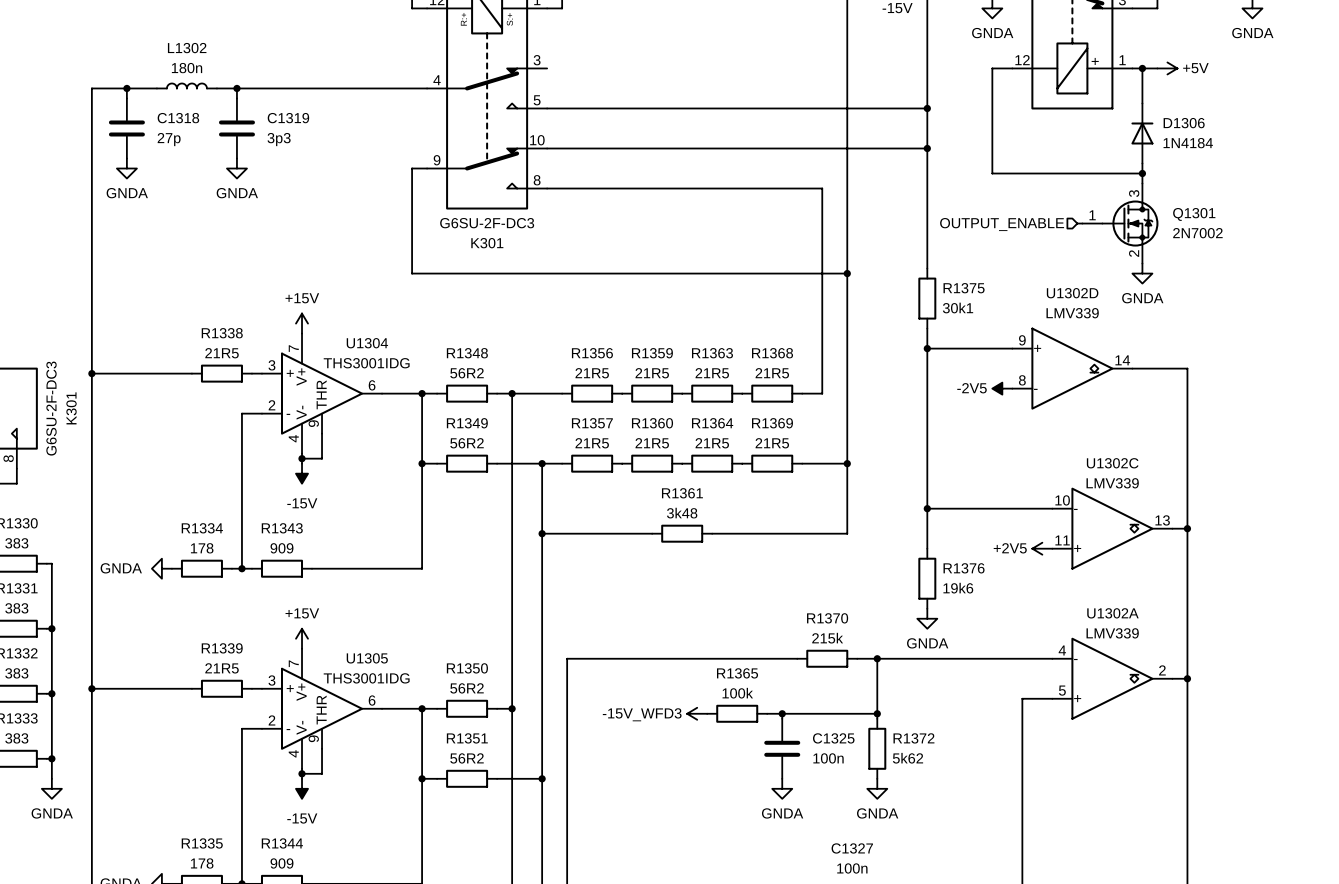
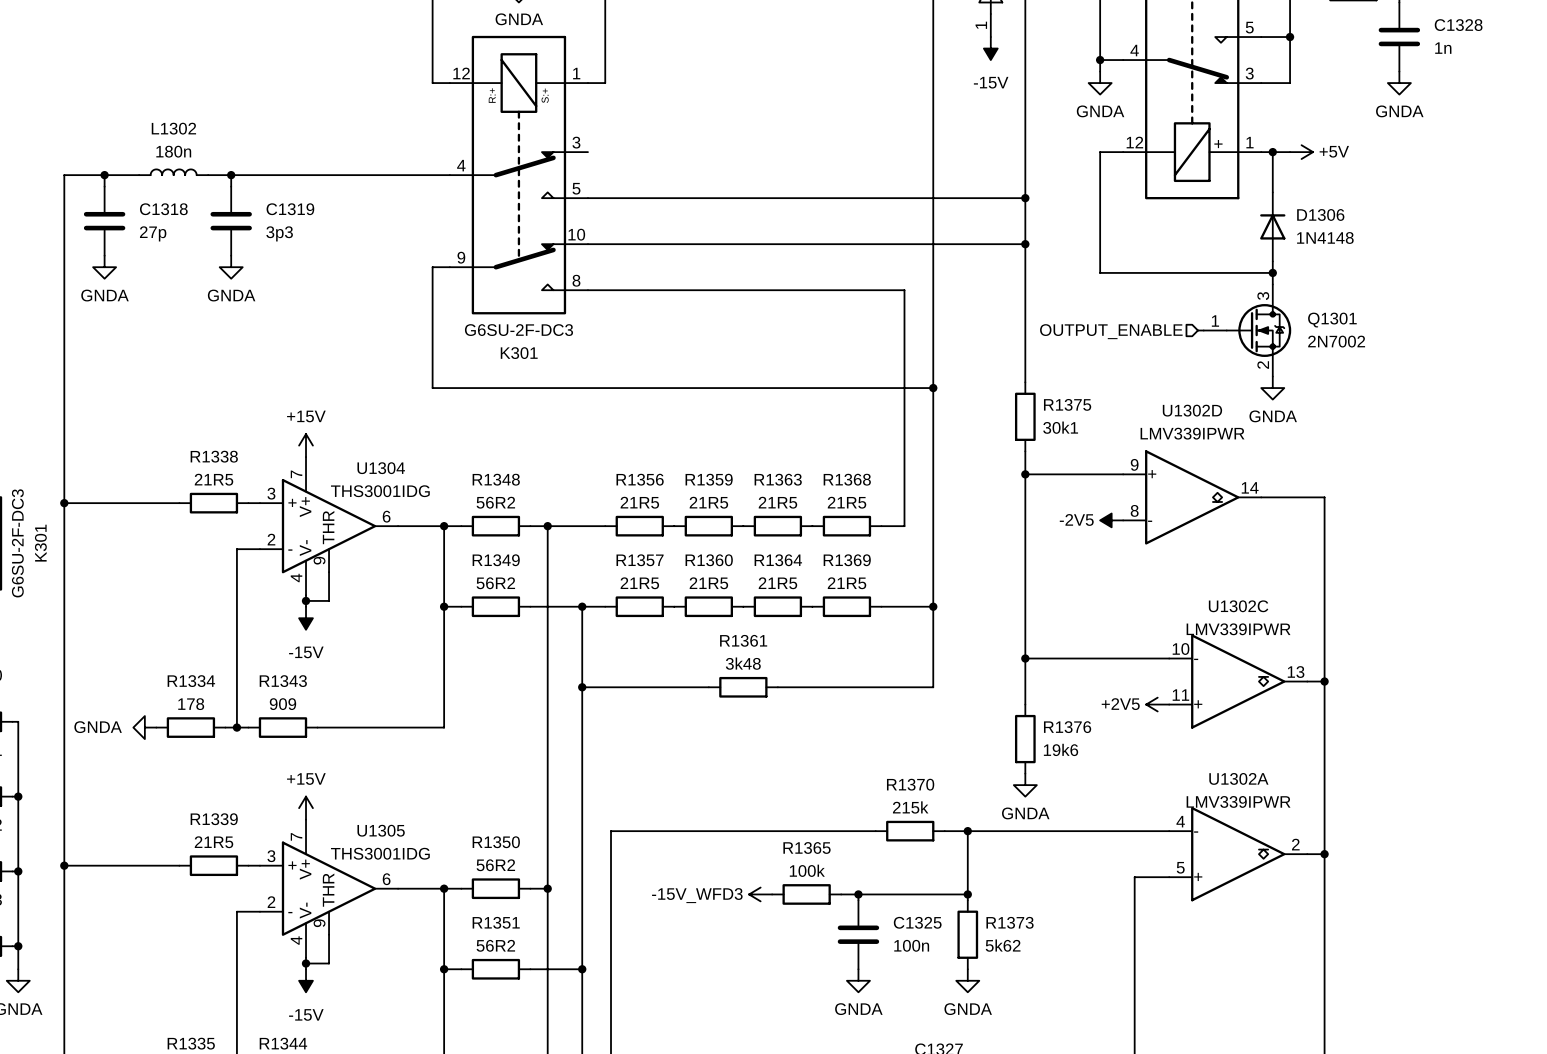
D1306 value: 1N4184 (1188, 143) -> 1N4148 (1325, 237)
U1302D value: LMV339 (1072, 313) -> LMV339IPWR (1192, 433)
U1302C value: LMV339 (1112, 483) -> LMV339IPWR (1238, 629)
U1302A value: LMV339 (1112, 633) -> LMV339IPWR (1238, 801)
R1372 name: R1372 (913, 738) -> R1373 (1010, 922)

